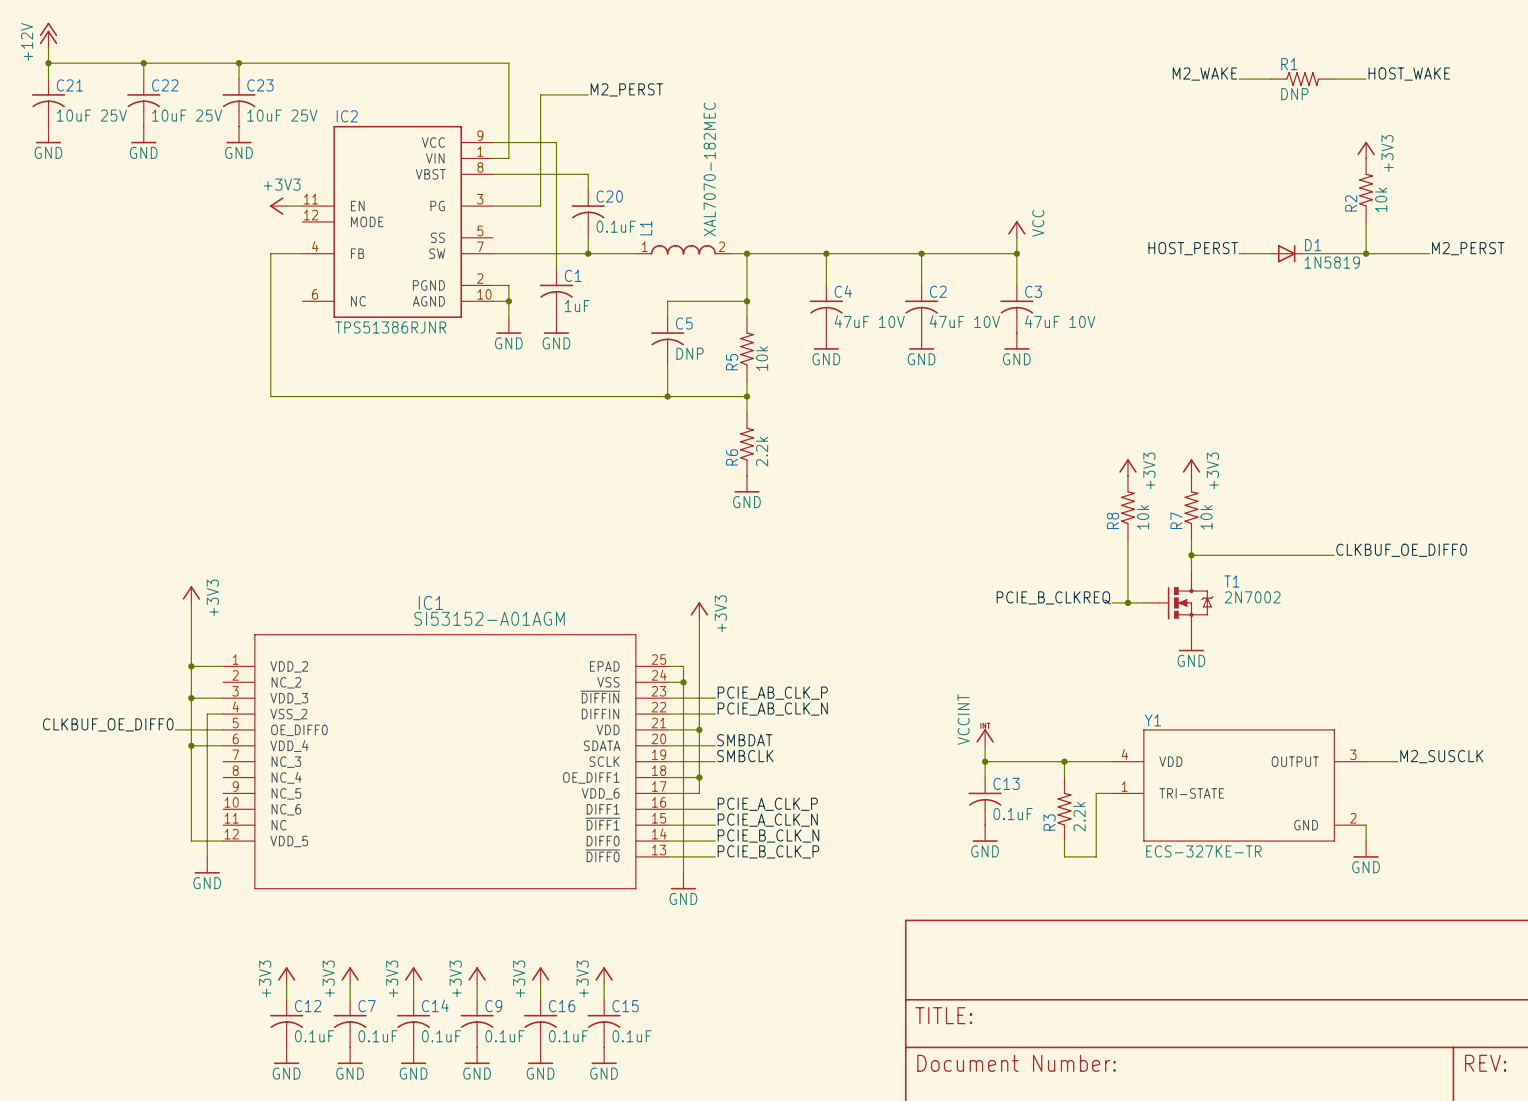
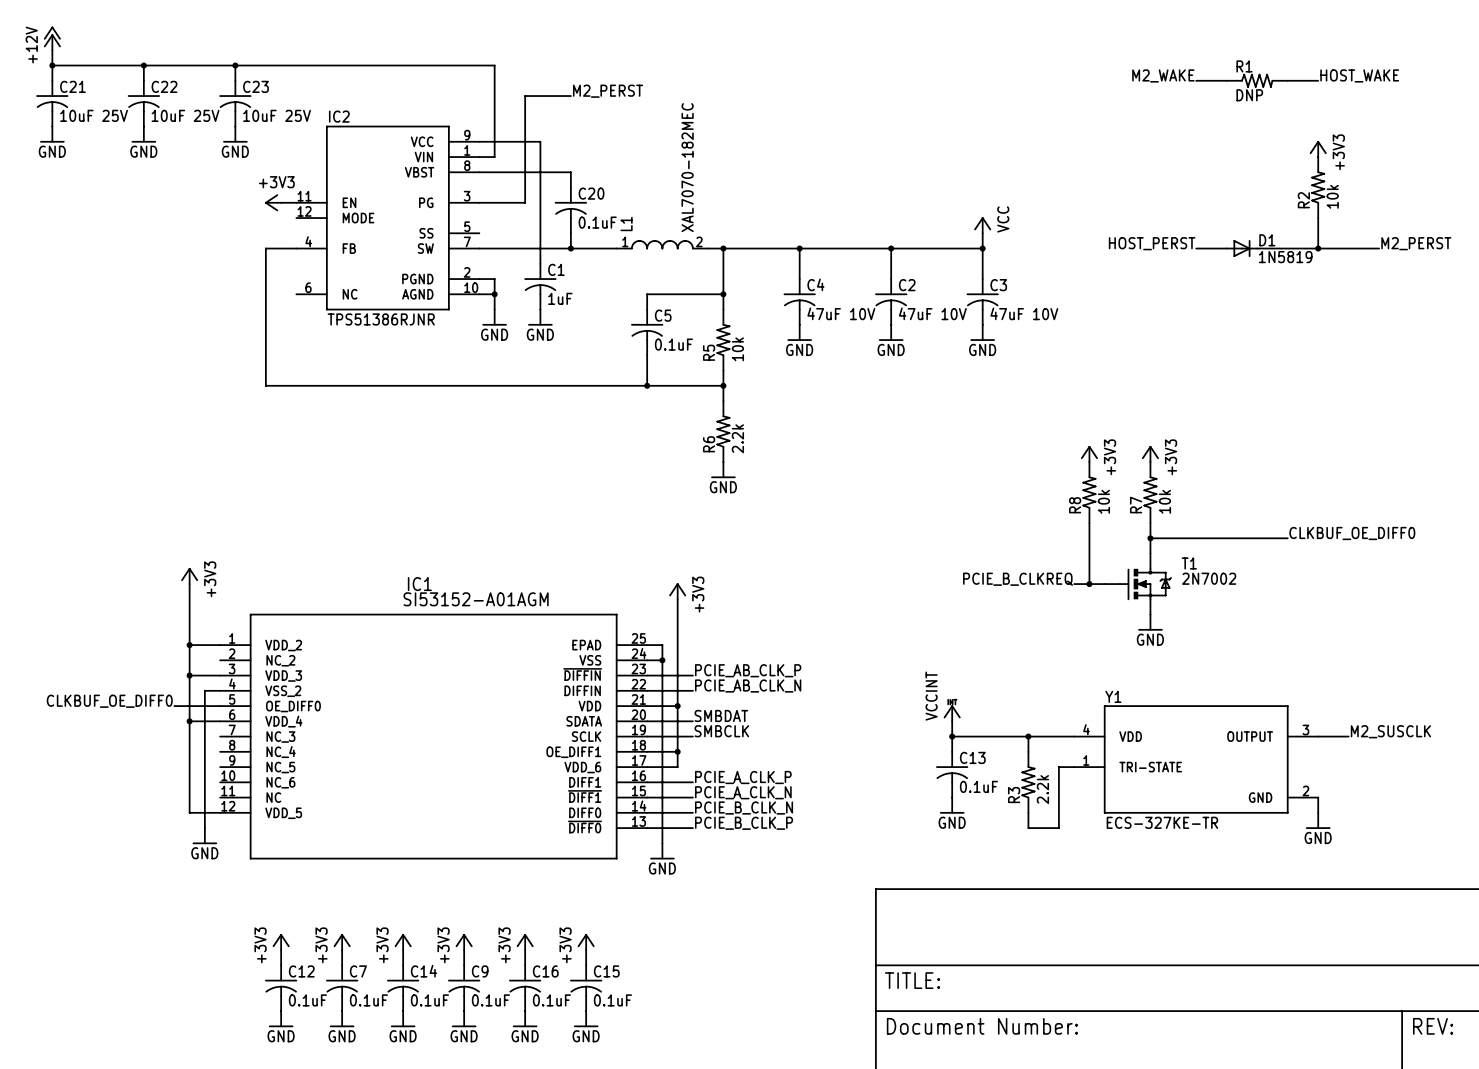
C5 value: DNP (690, 353) -> 0.1uF (673, 344)

